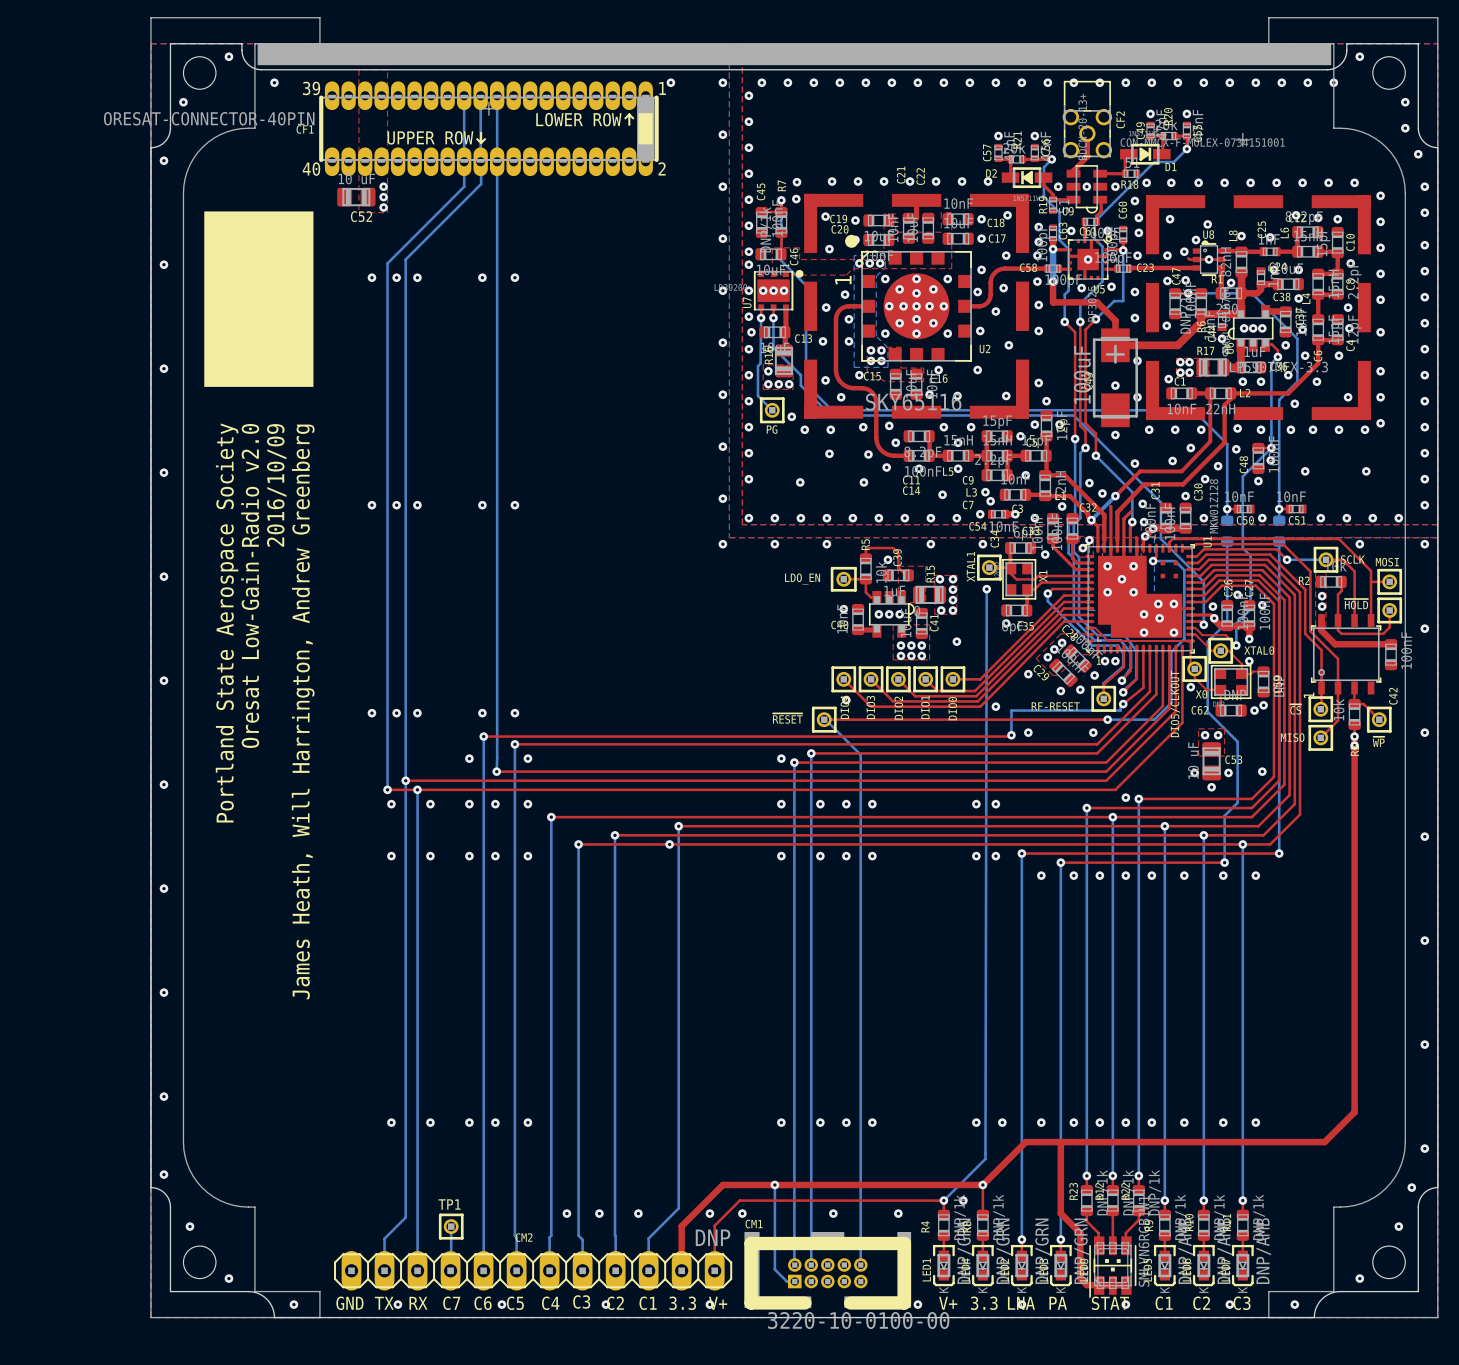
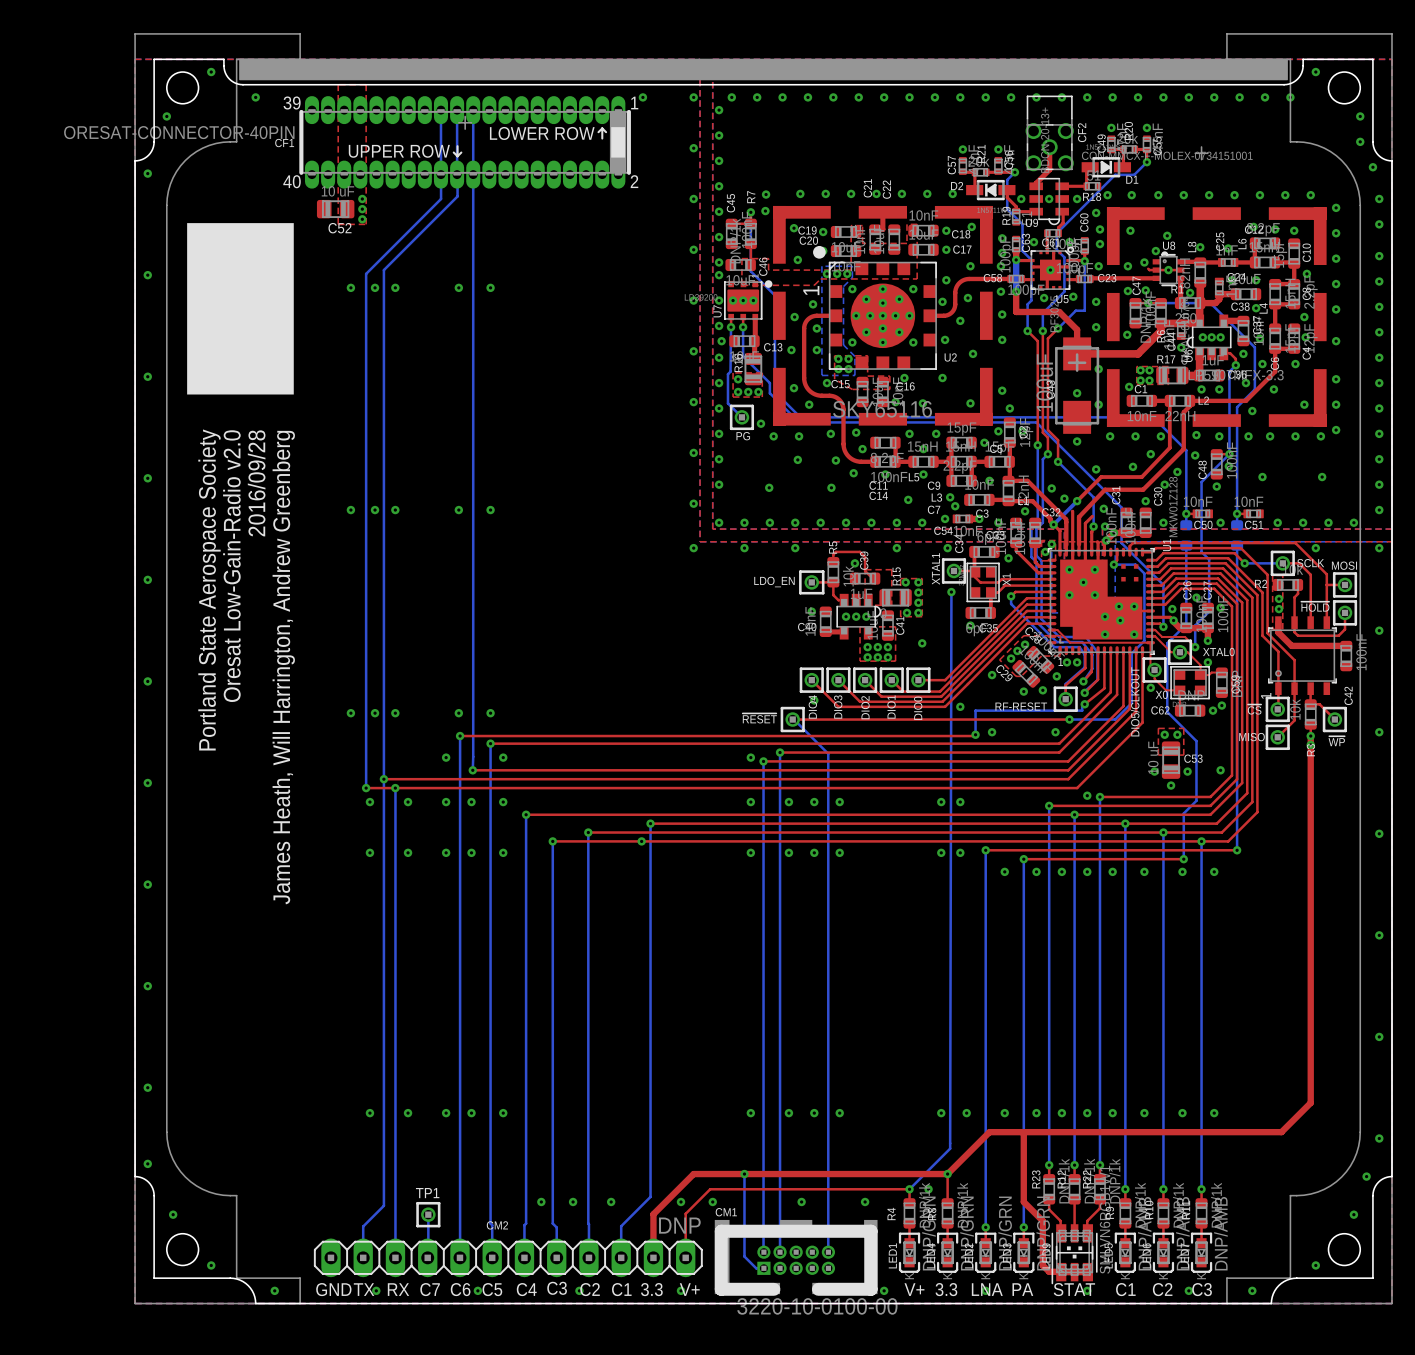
text: 2016/10/09 (276, 485) -> 2016/09/28 (256, 483)

